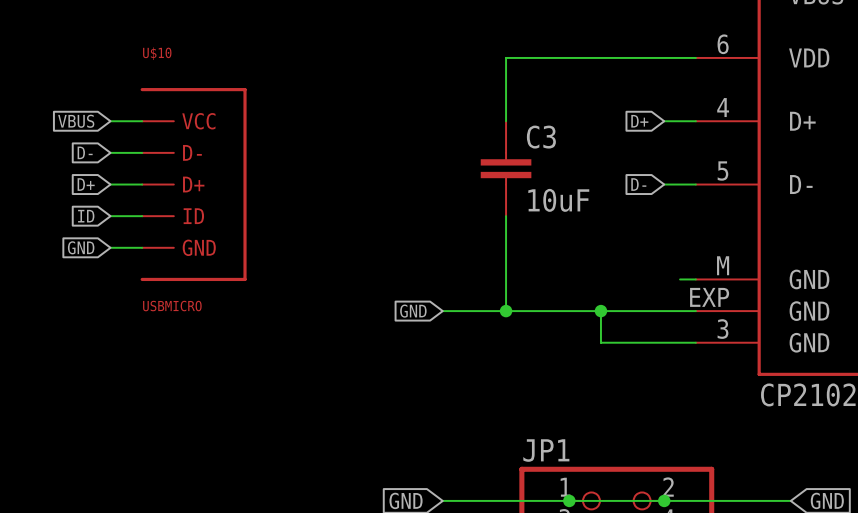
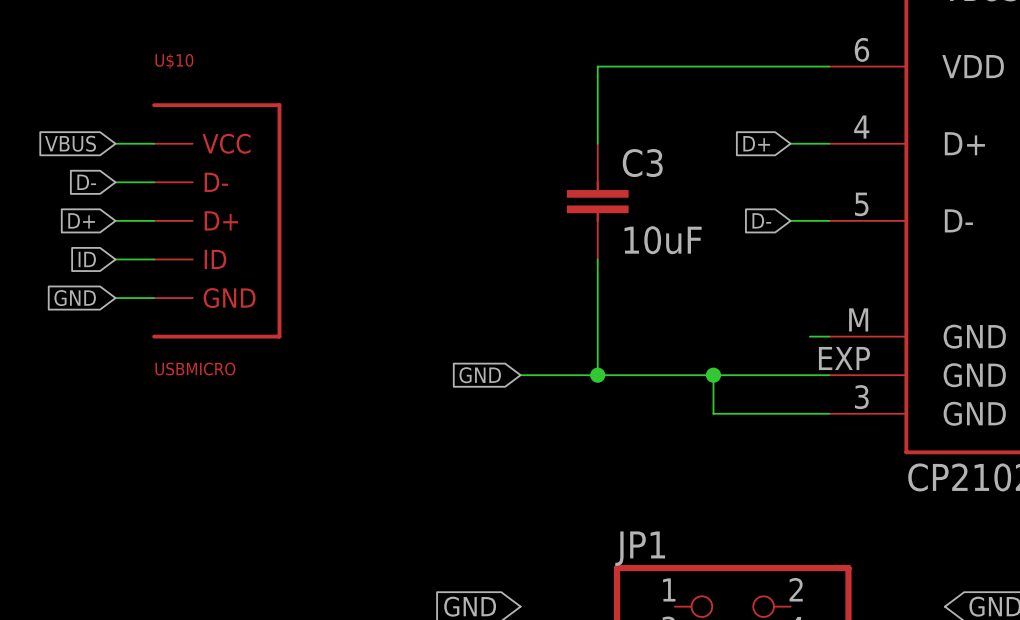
wire: (442, 500) (790, 500) -> none
junction: (569, 500) -> none
junction: (664, 500) -> none

